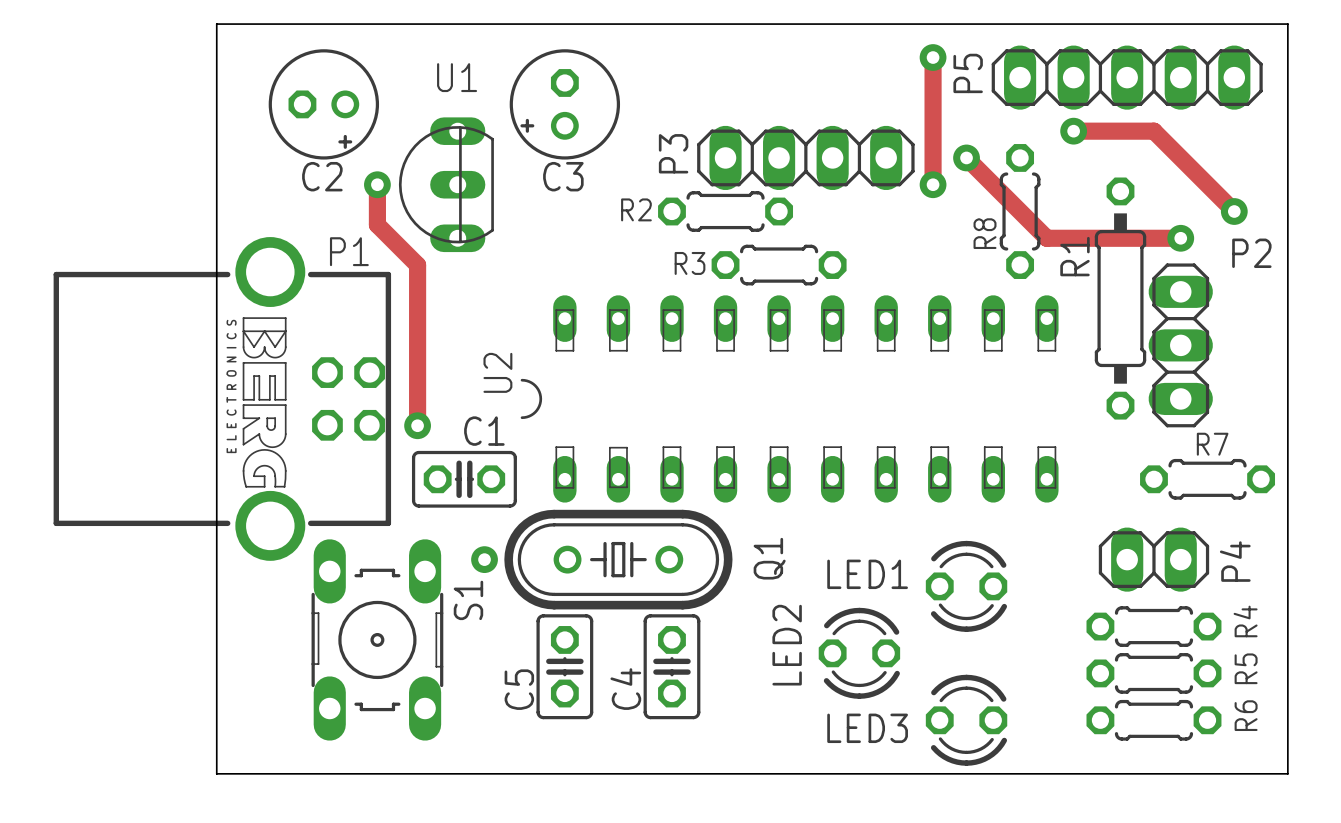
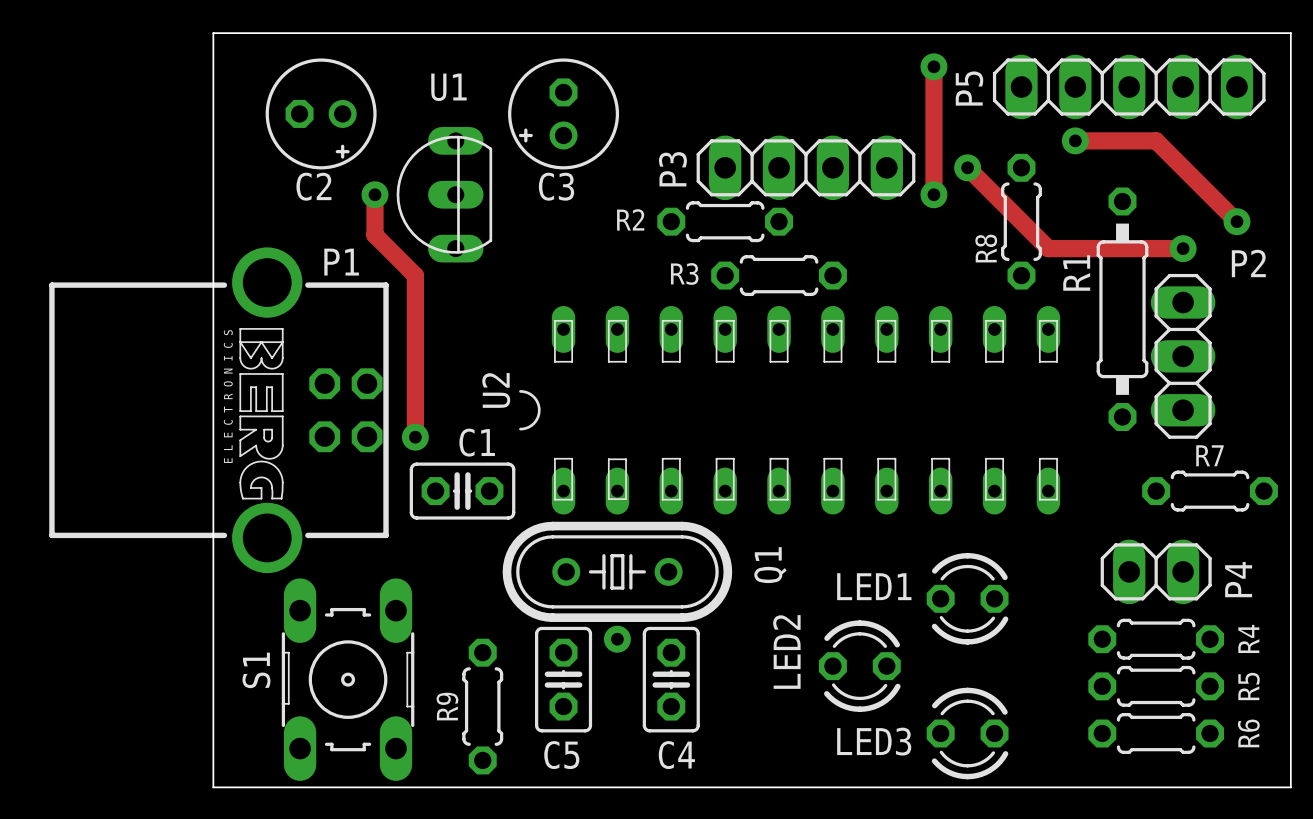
via: (484, 559) -> none
S1 name position: S1 (468, 600) -> S1 (256, 670)
via: none -> (617, 639)
S1 position: (377, 639) -> (348, 679)
C5 name rotation: 0° (519, 689) -> 90° clockwise (561, 755)
C5 name position: C5 (519, 689) -> C5 (561, 755)
C4 name rotation: 0° (625, 689) -> 90° clockwise (676, 755)
C4 name position: C4 (625, 689) -> C4 (676, 755)
R9: none -> (482, 706)

